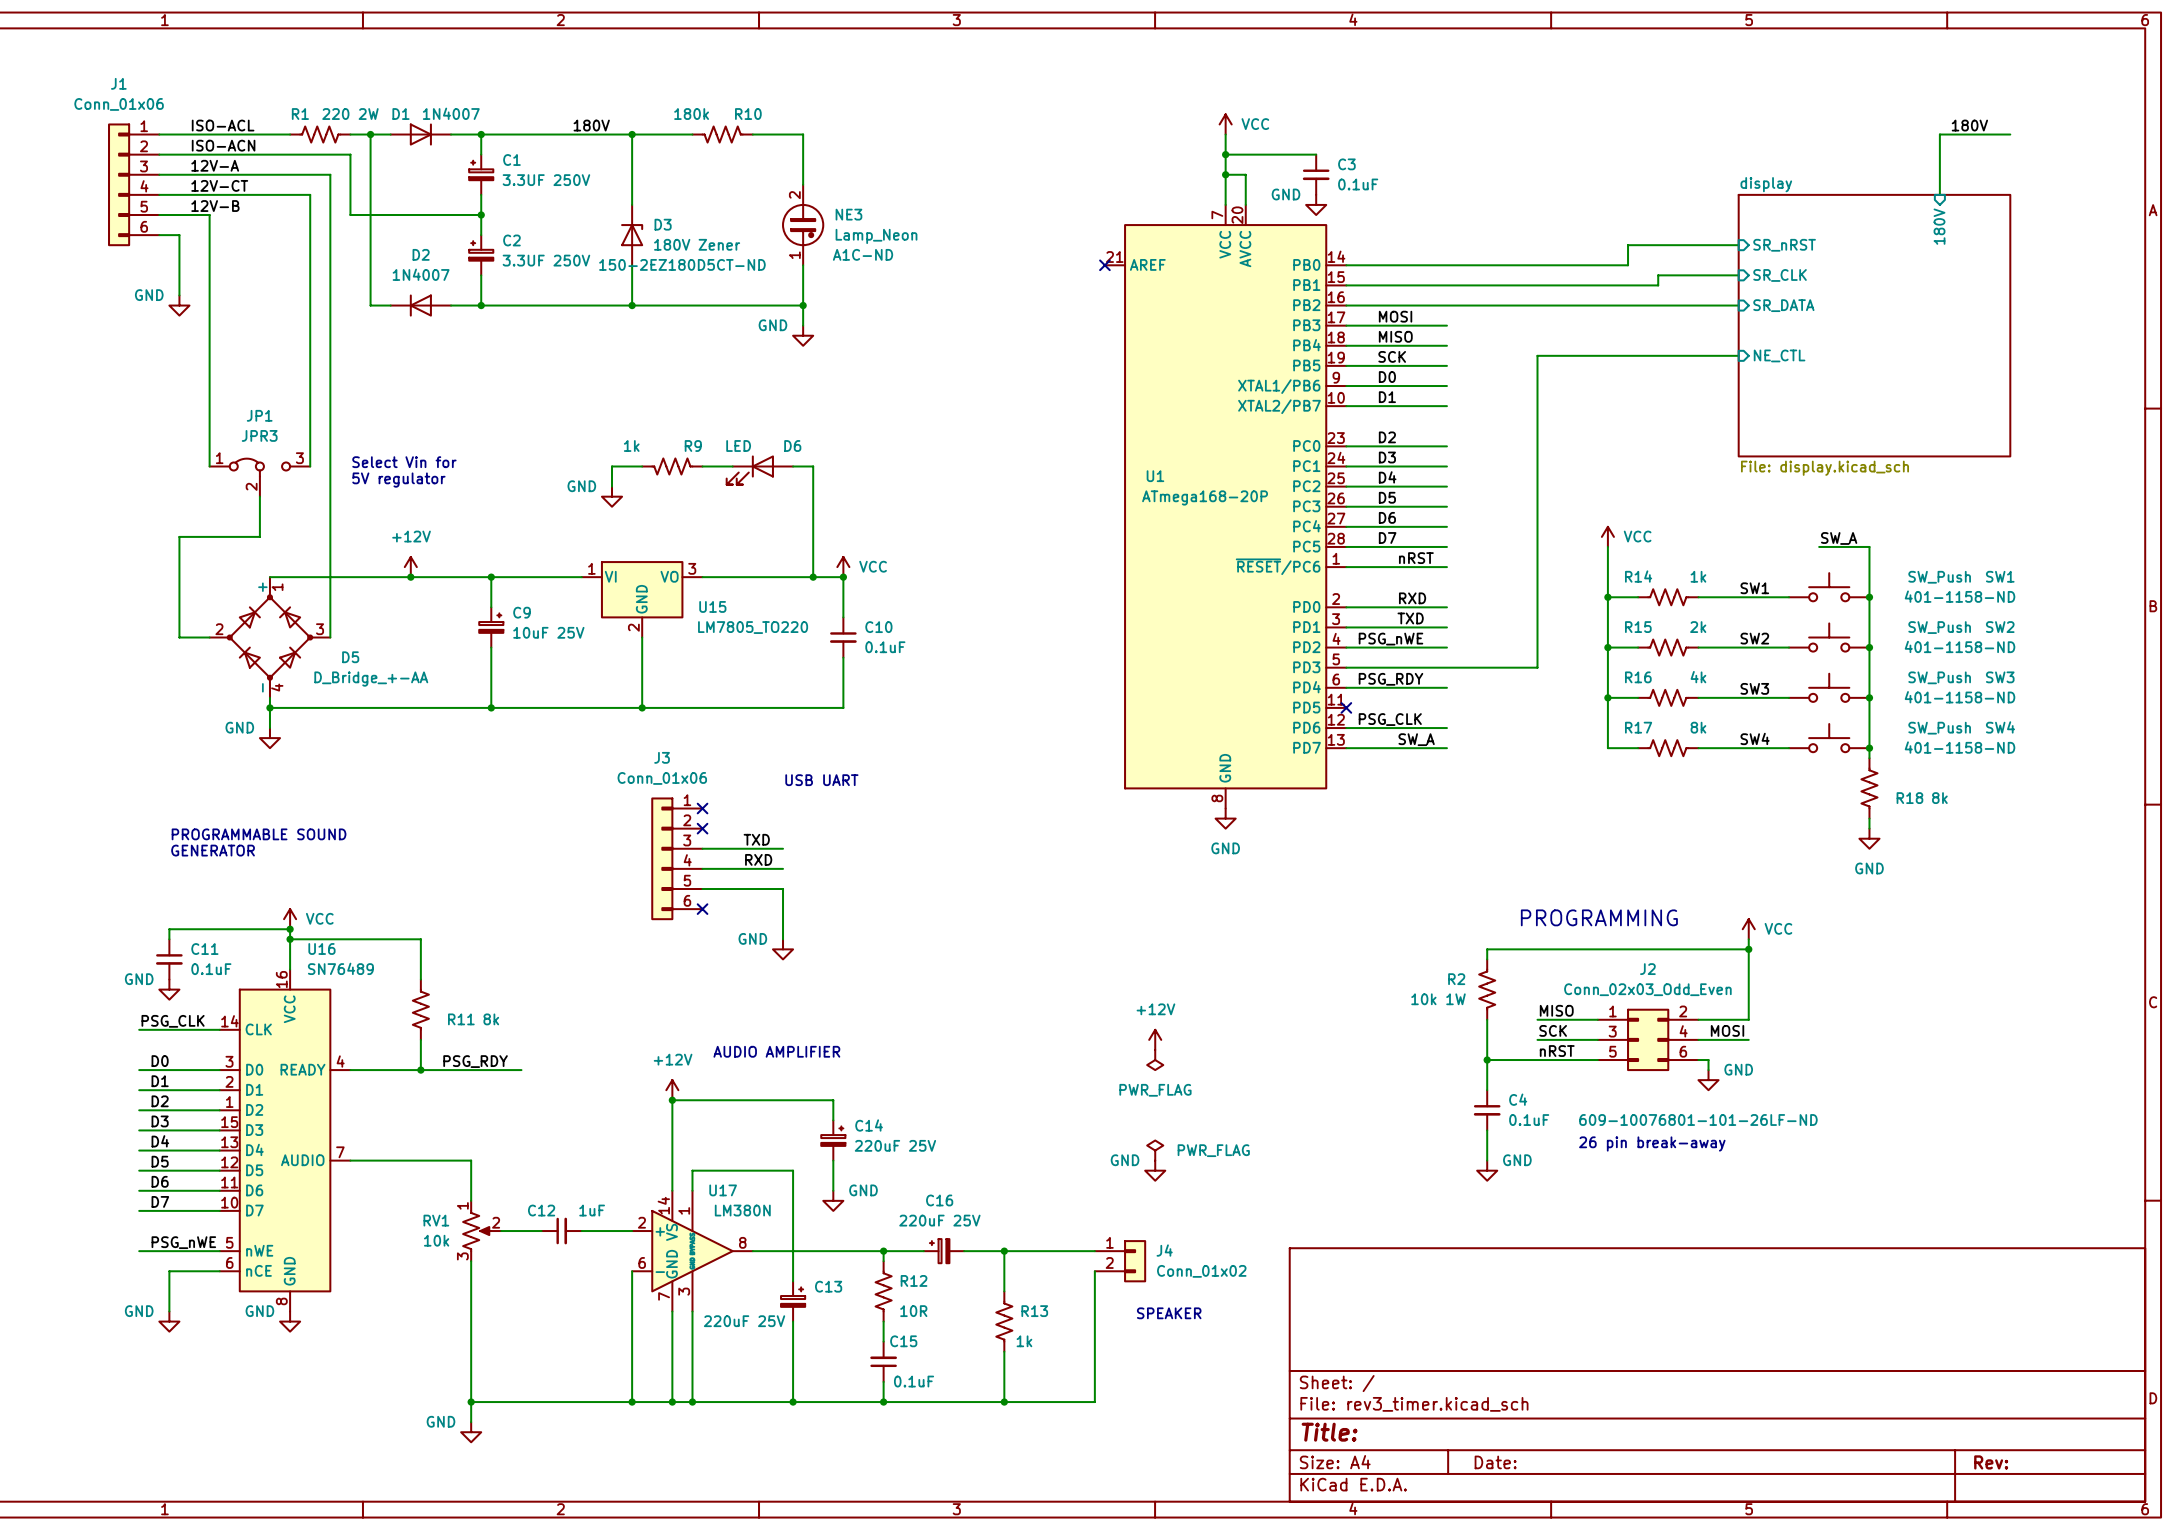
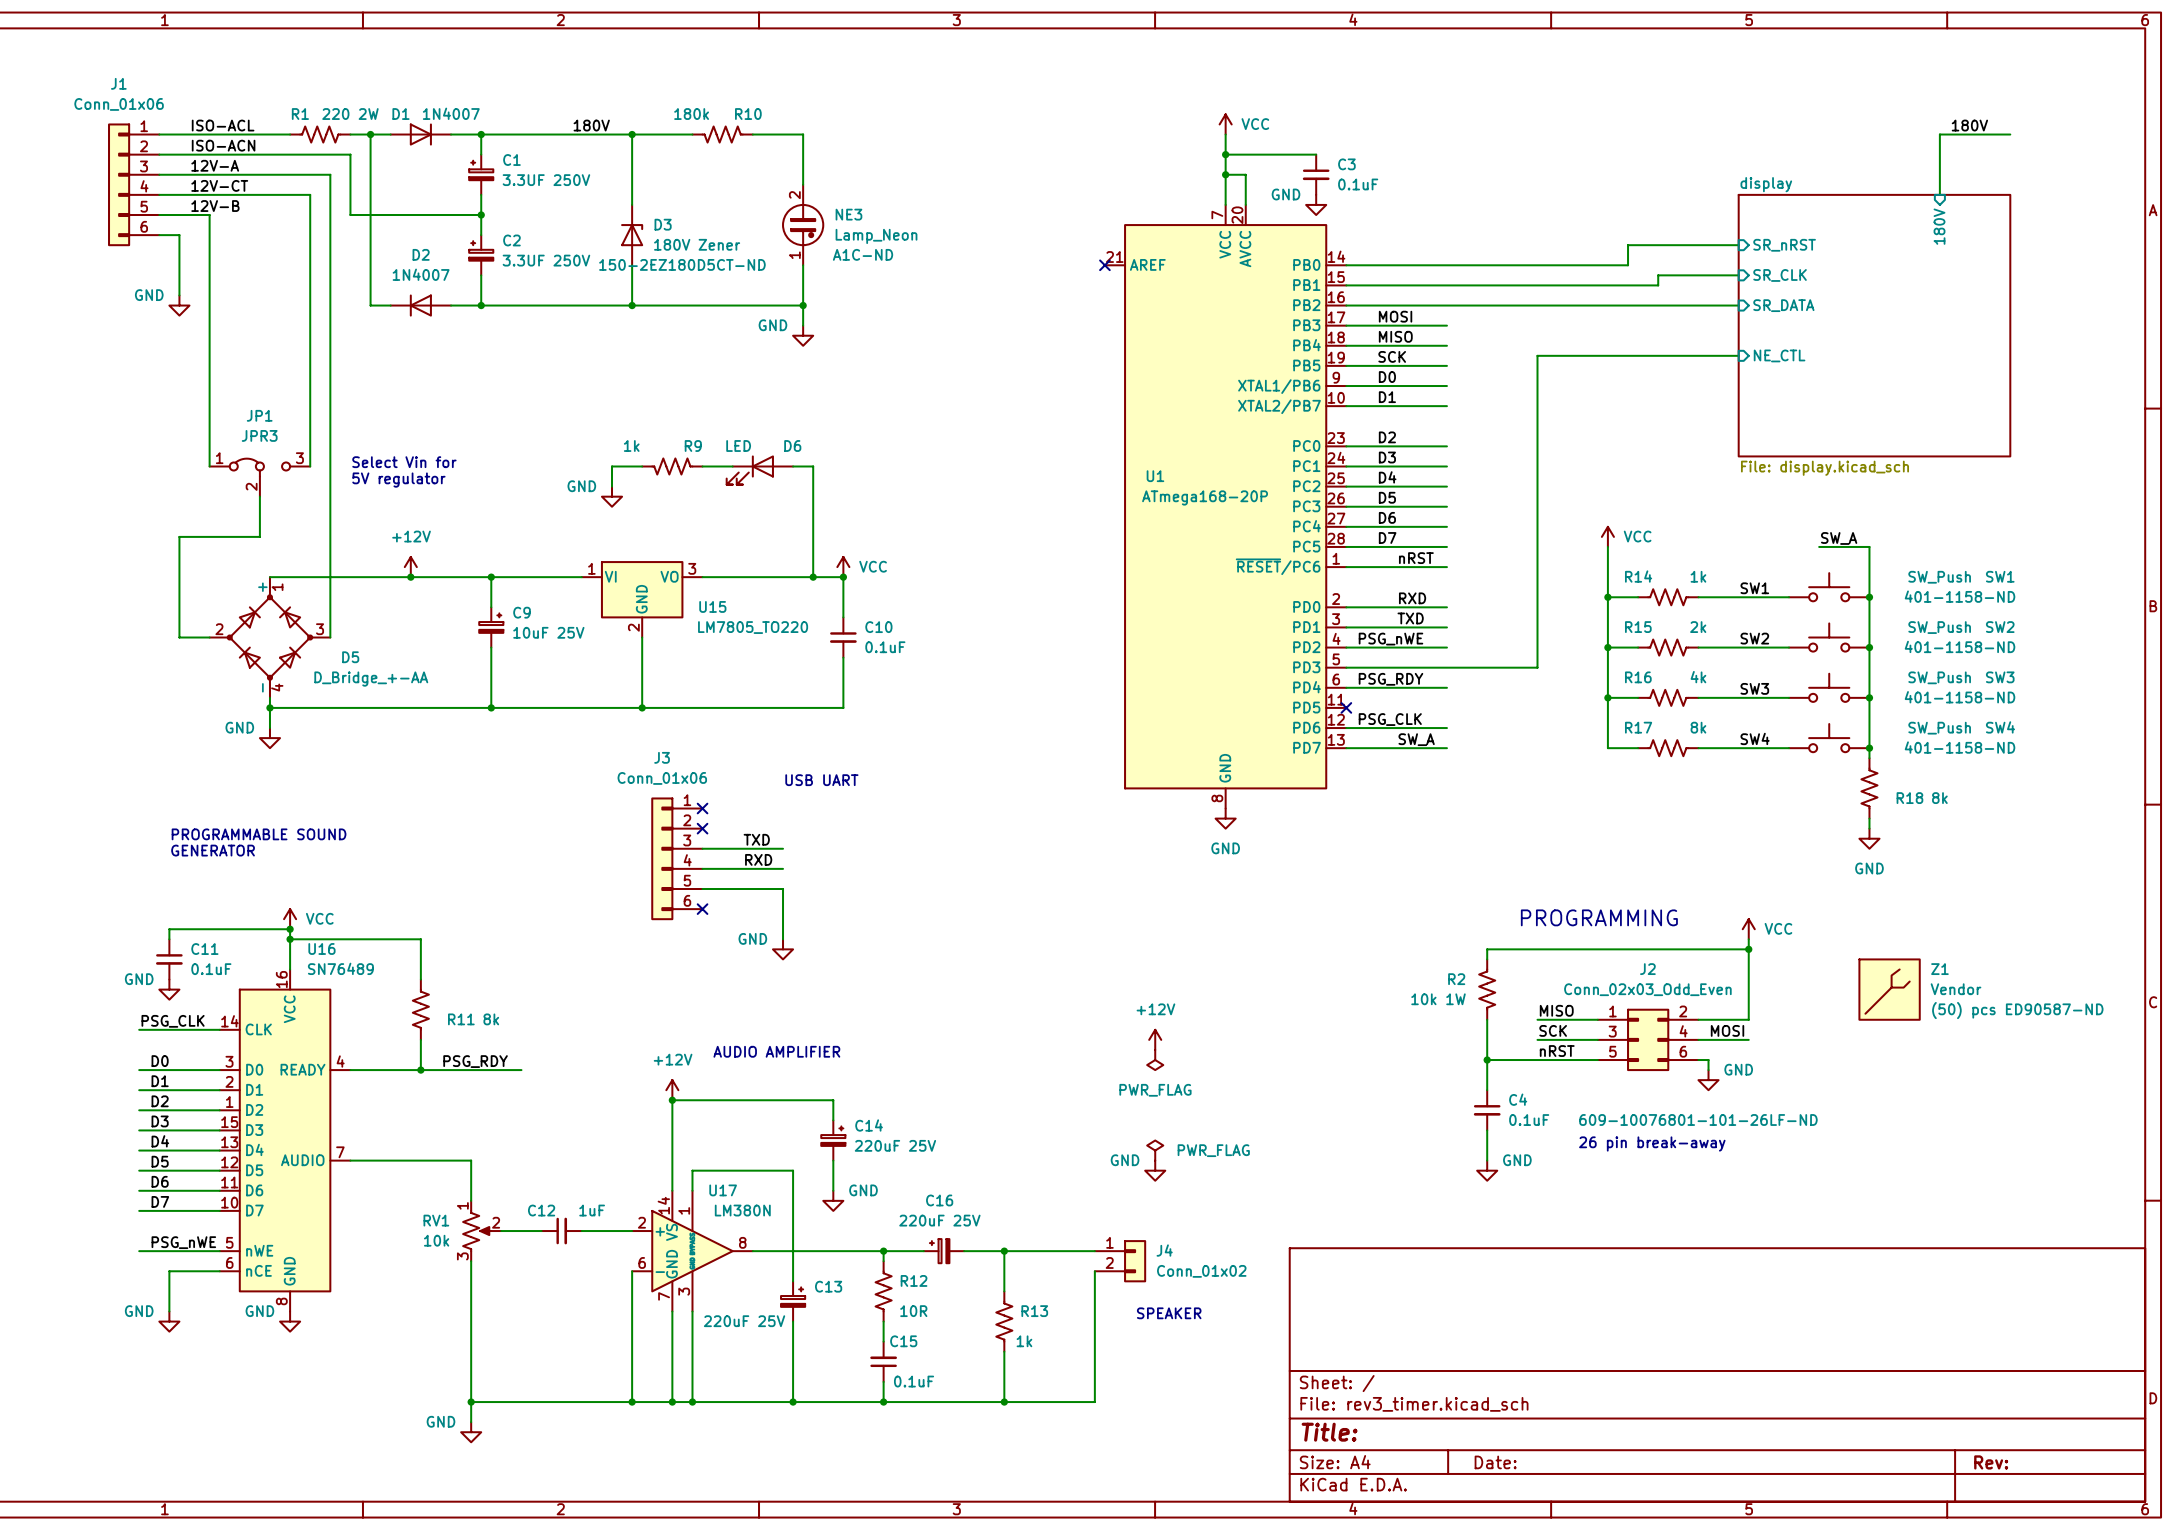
Z1: none -> (1889, 989)

